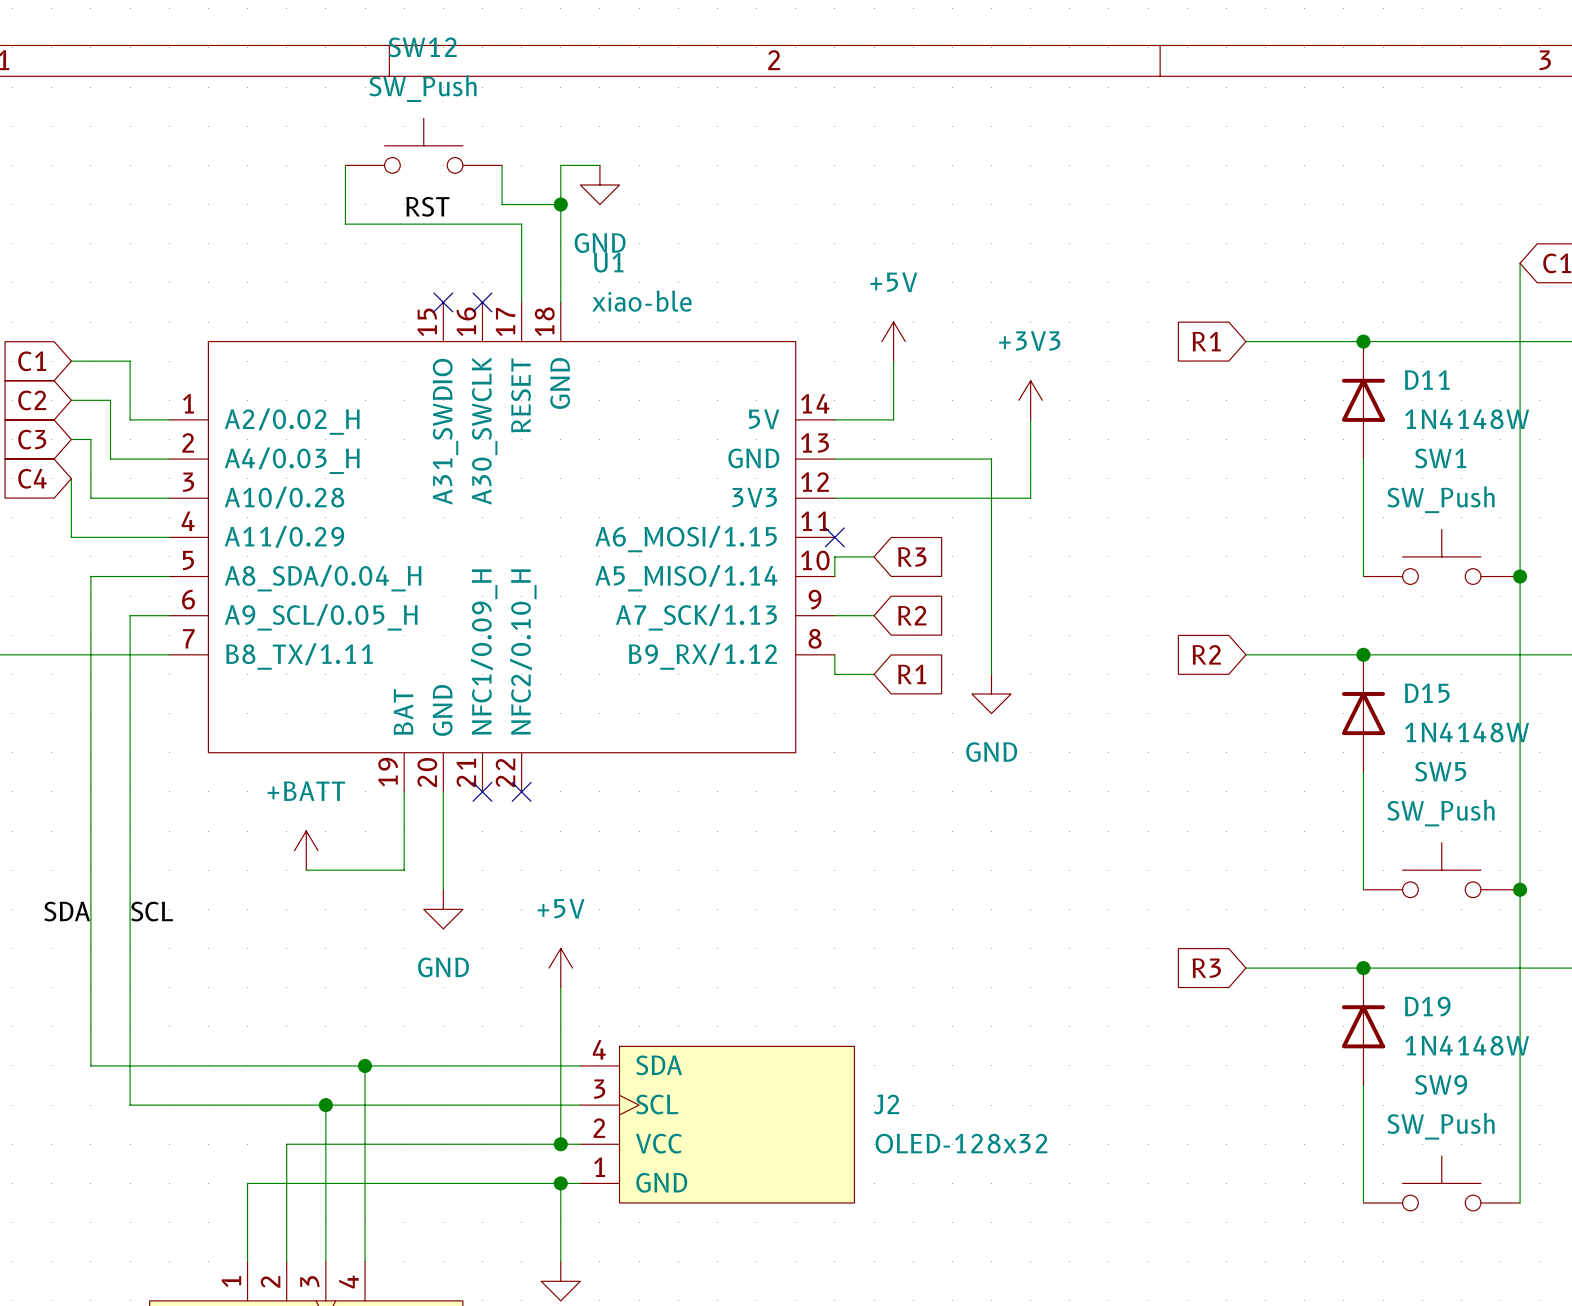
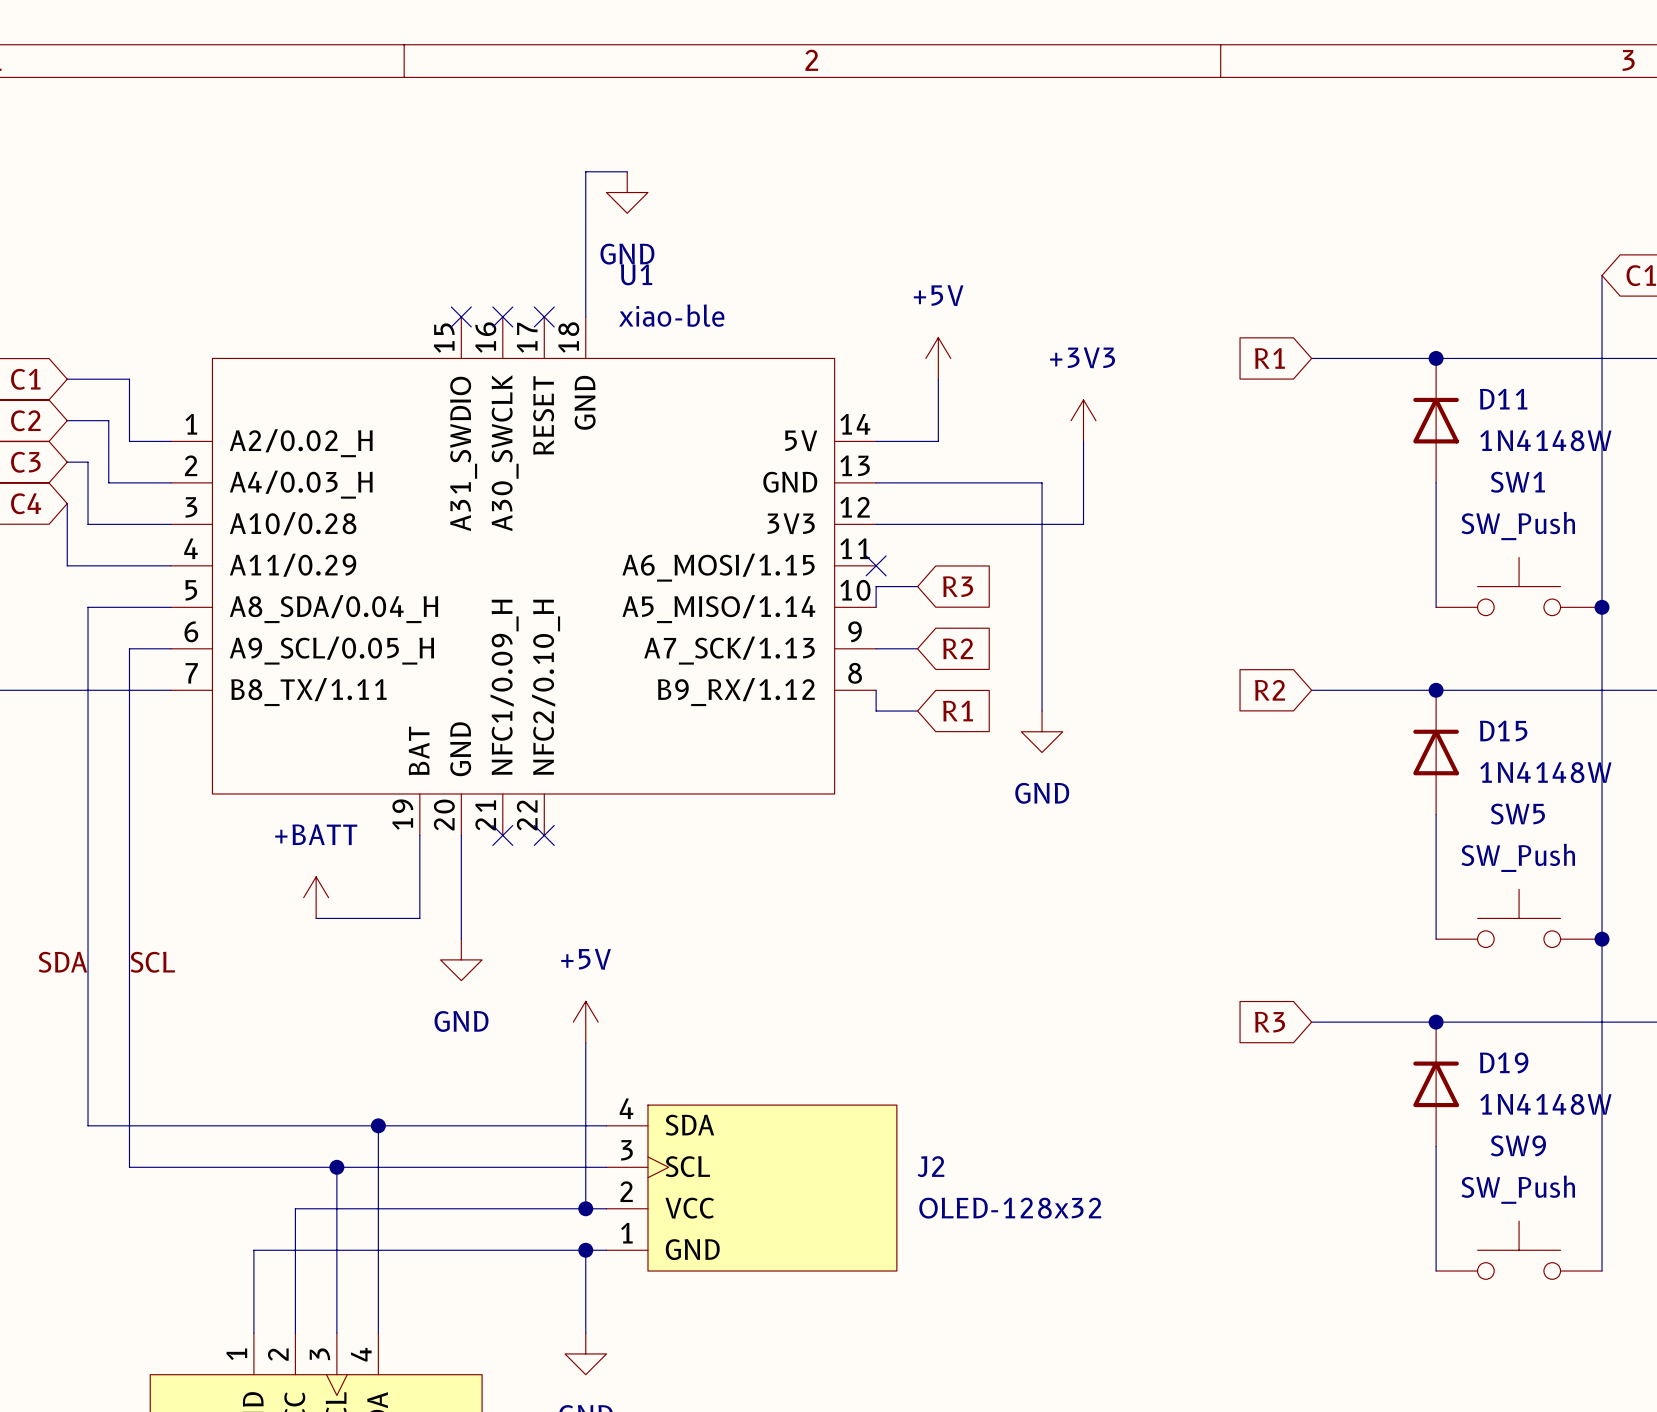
SW12: SW_Push (423, 145) -> none
wire: (345, 165) (345, 224) (521, 224) (521, 302) -> none
wire: (502, 165) (502, 204) (560, 204) -> none
junction: (560, 204) -> none
label: RST (427, 206) -> none
no-connect mark: none -> (544, 316)

